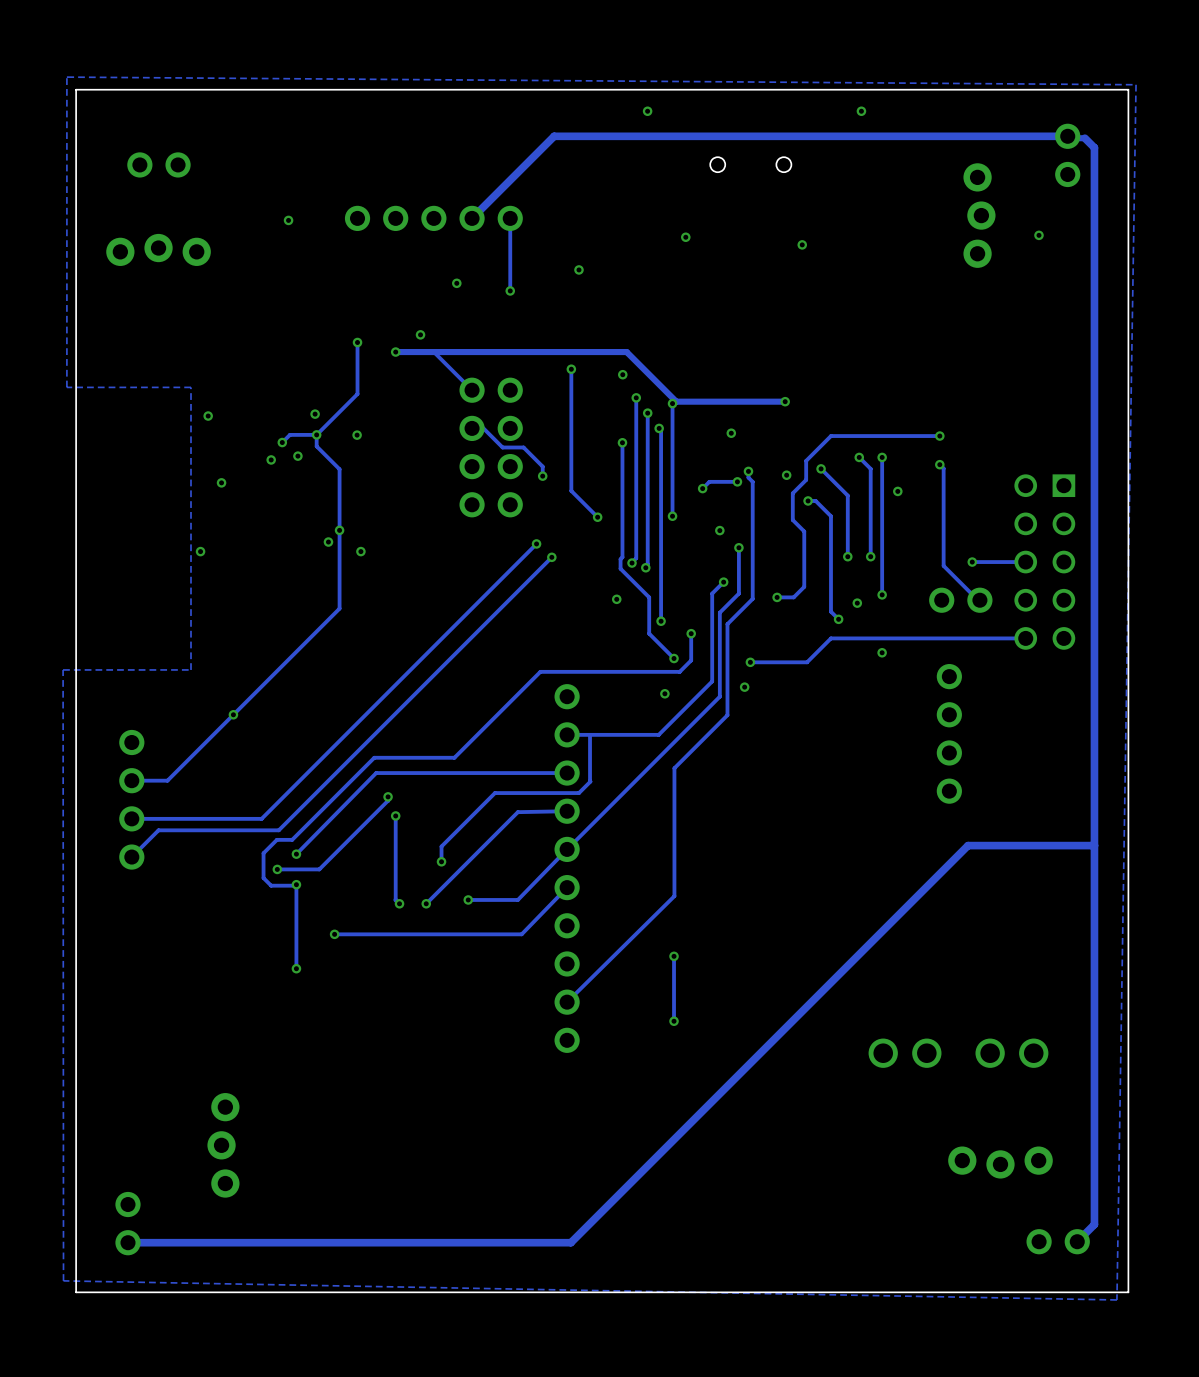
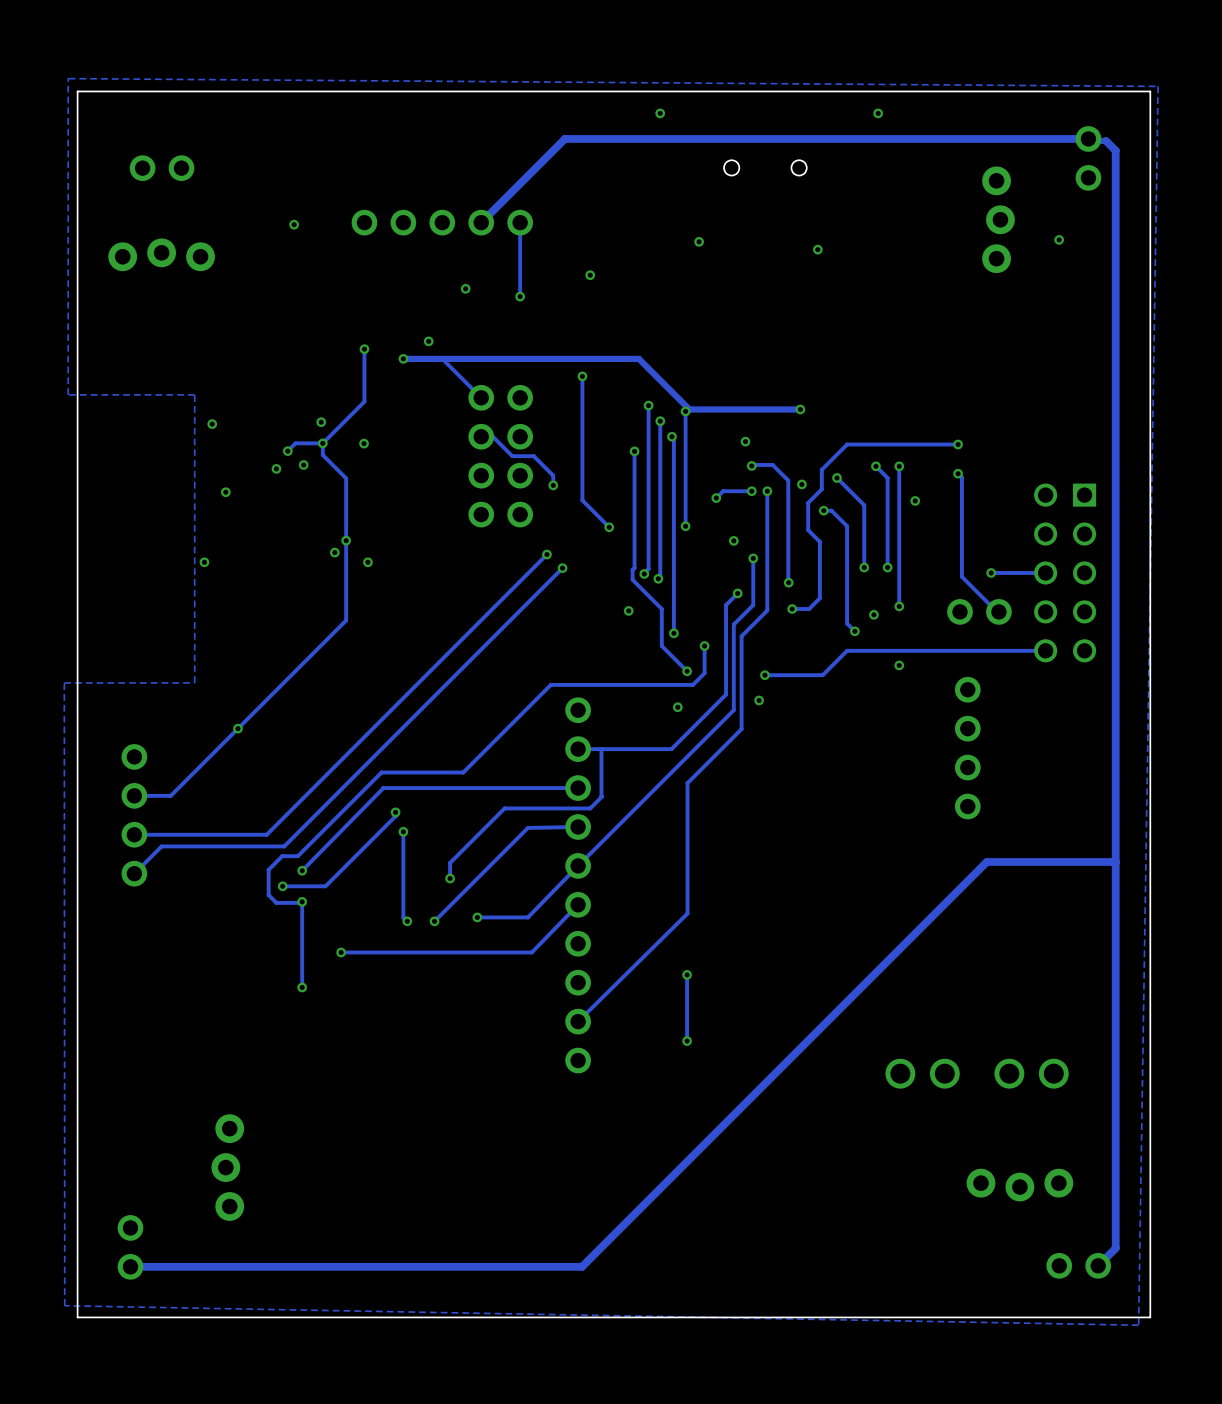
via: (622, 374) -> none
track: none -> (751, 465) (772, 464) (788, 480) (788, 582)
via: none -> (751, 465)
track: (748, 471) (748, 477) (752, 481) -> none
via: (748, 471) -> none
via: none -> (767, 491)
via: none -> (788, 582)

